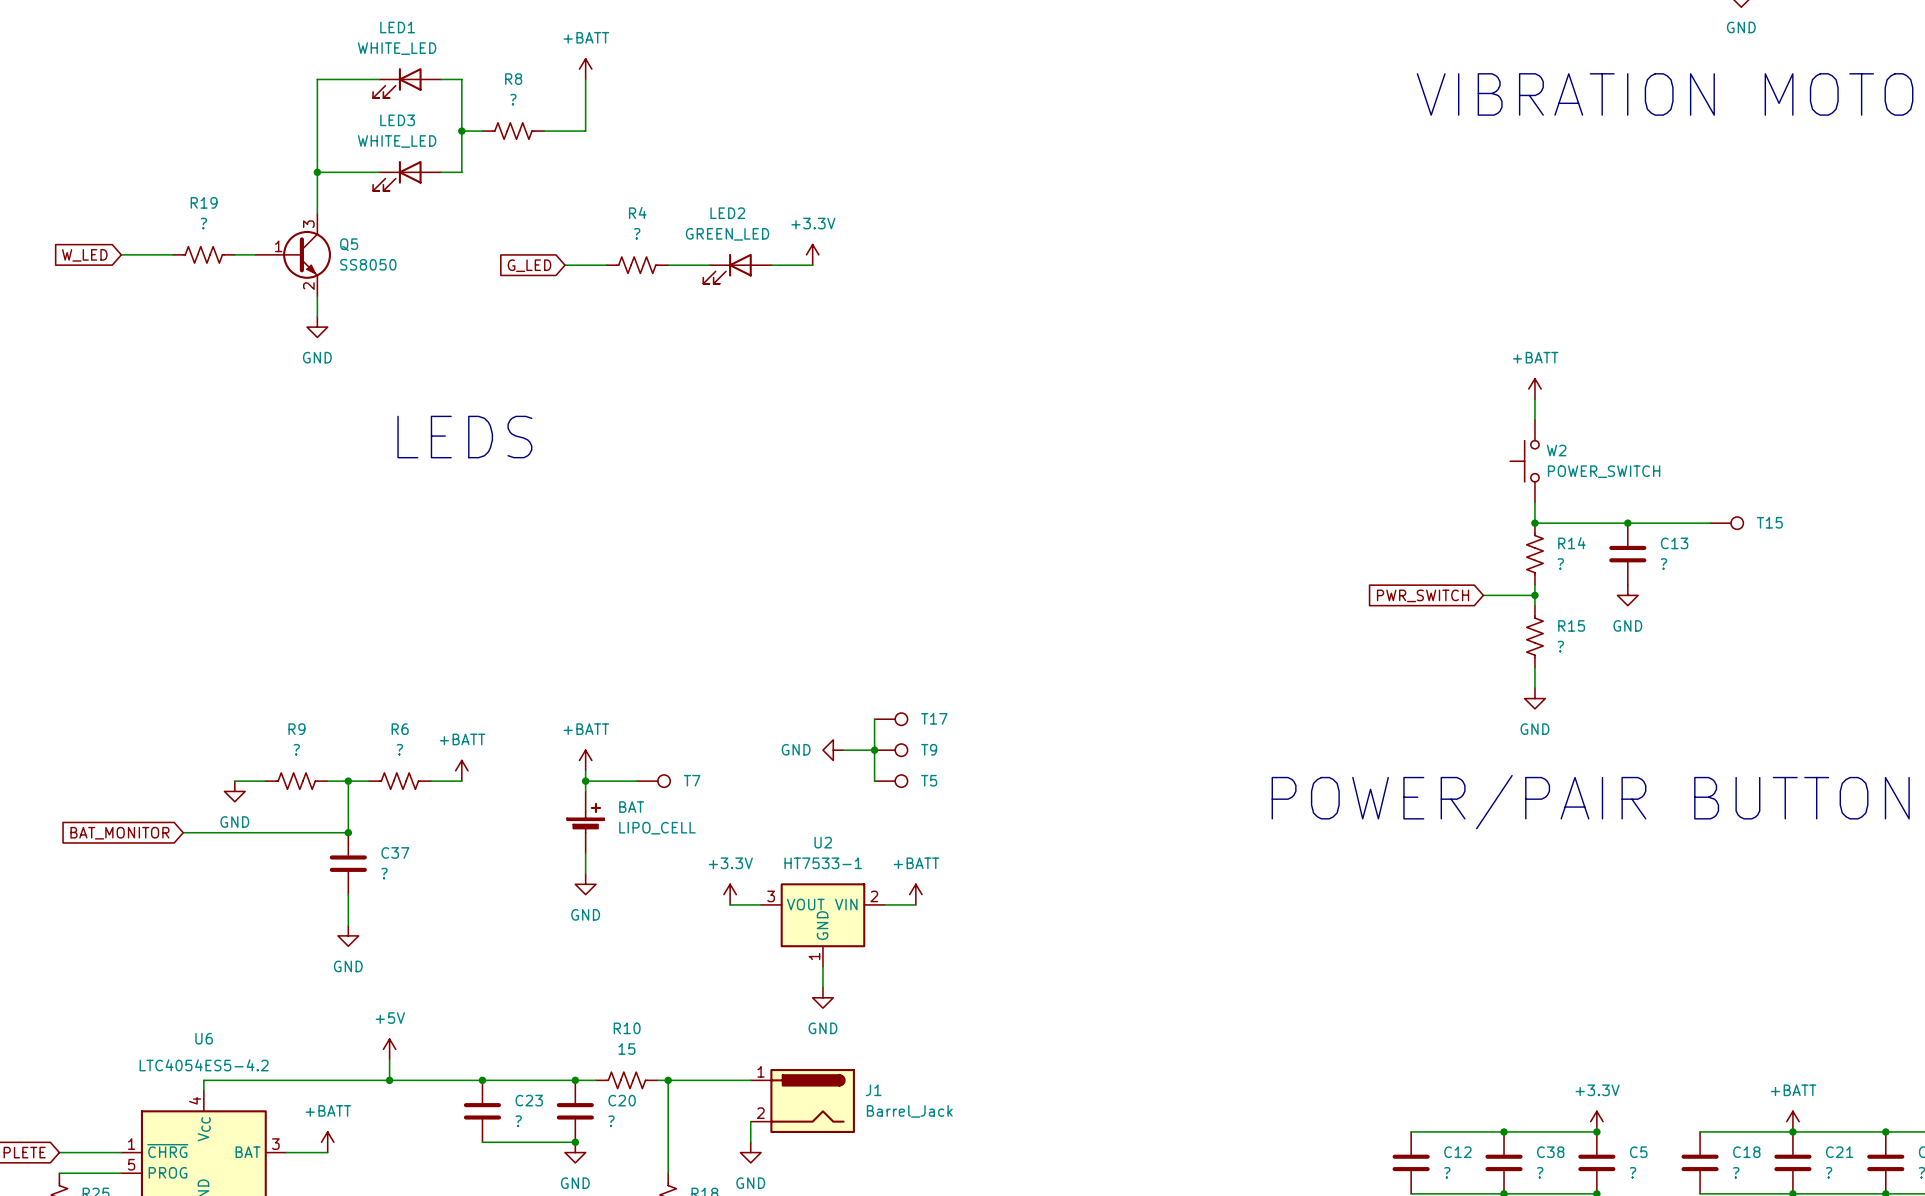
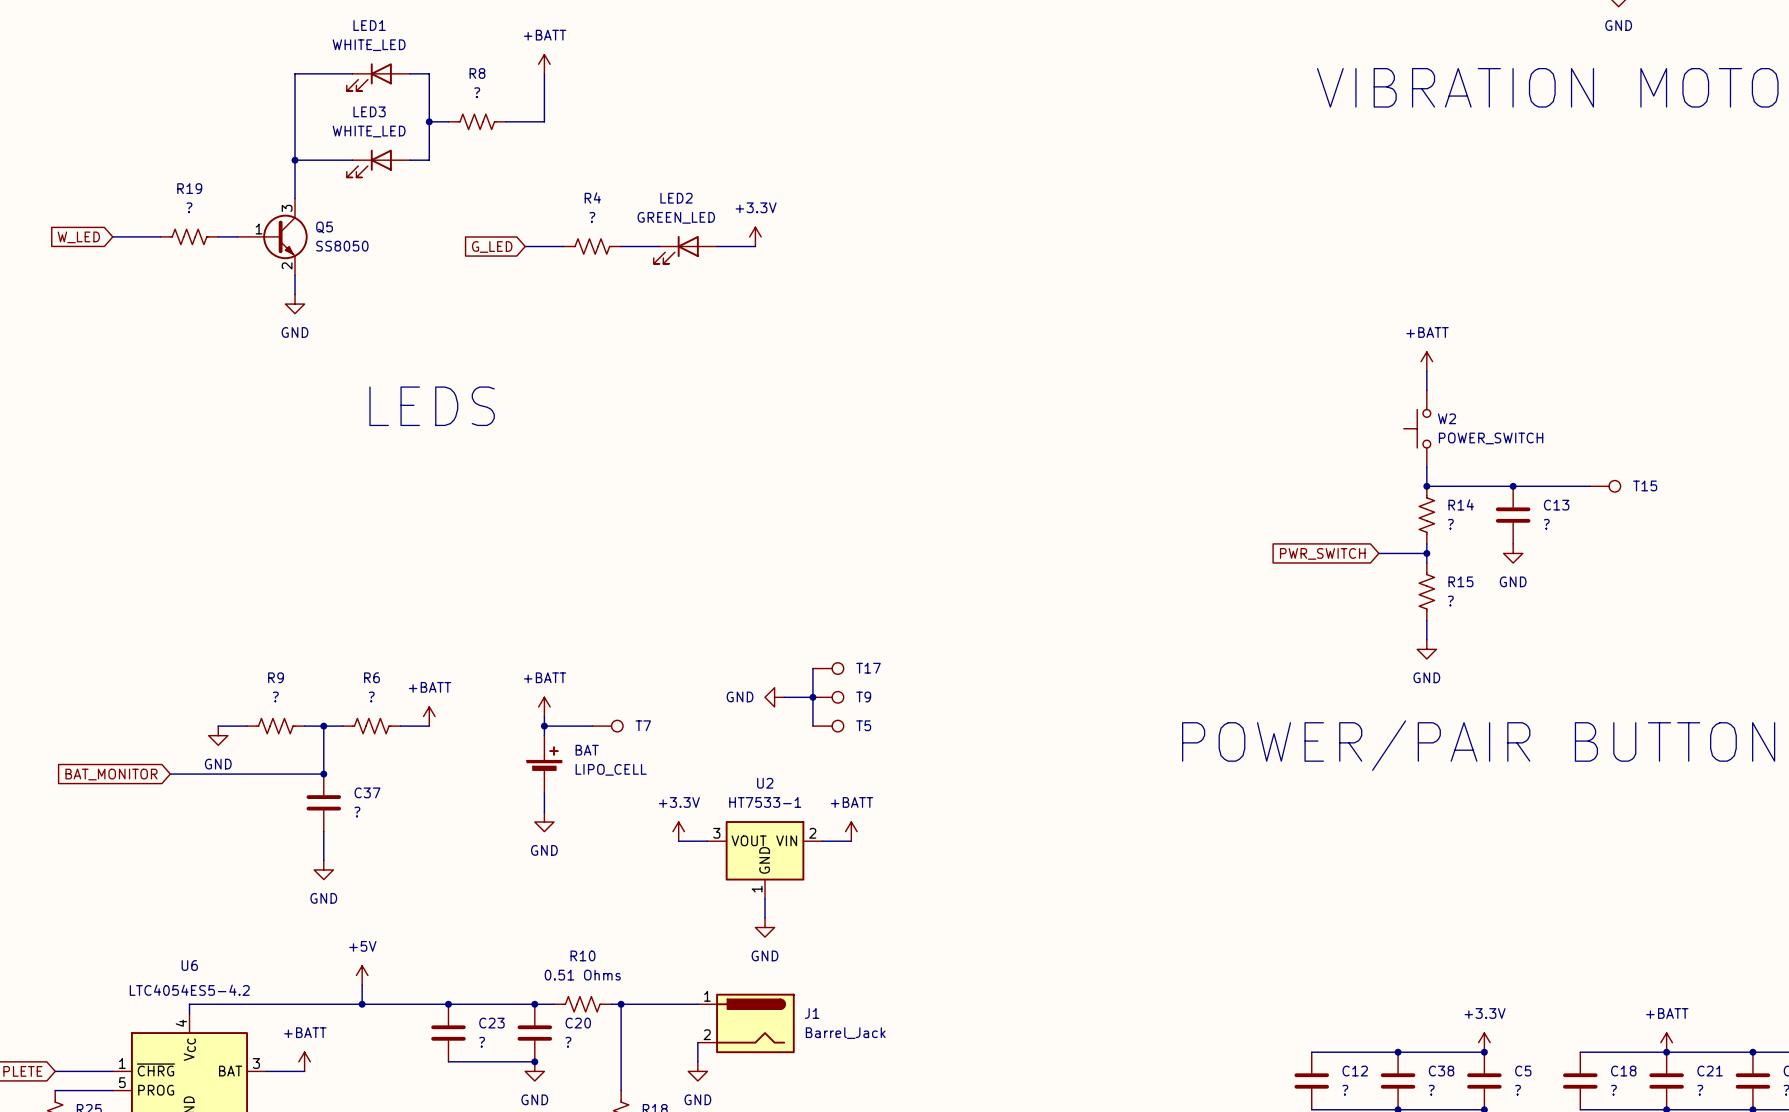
R10 value: 15 (626, 1049) -> 0.51 Ohms (582, 975)

